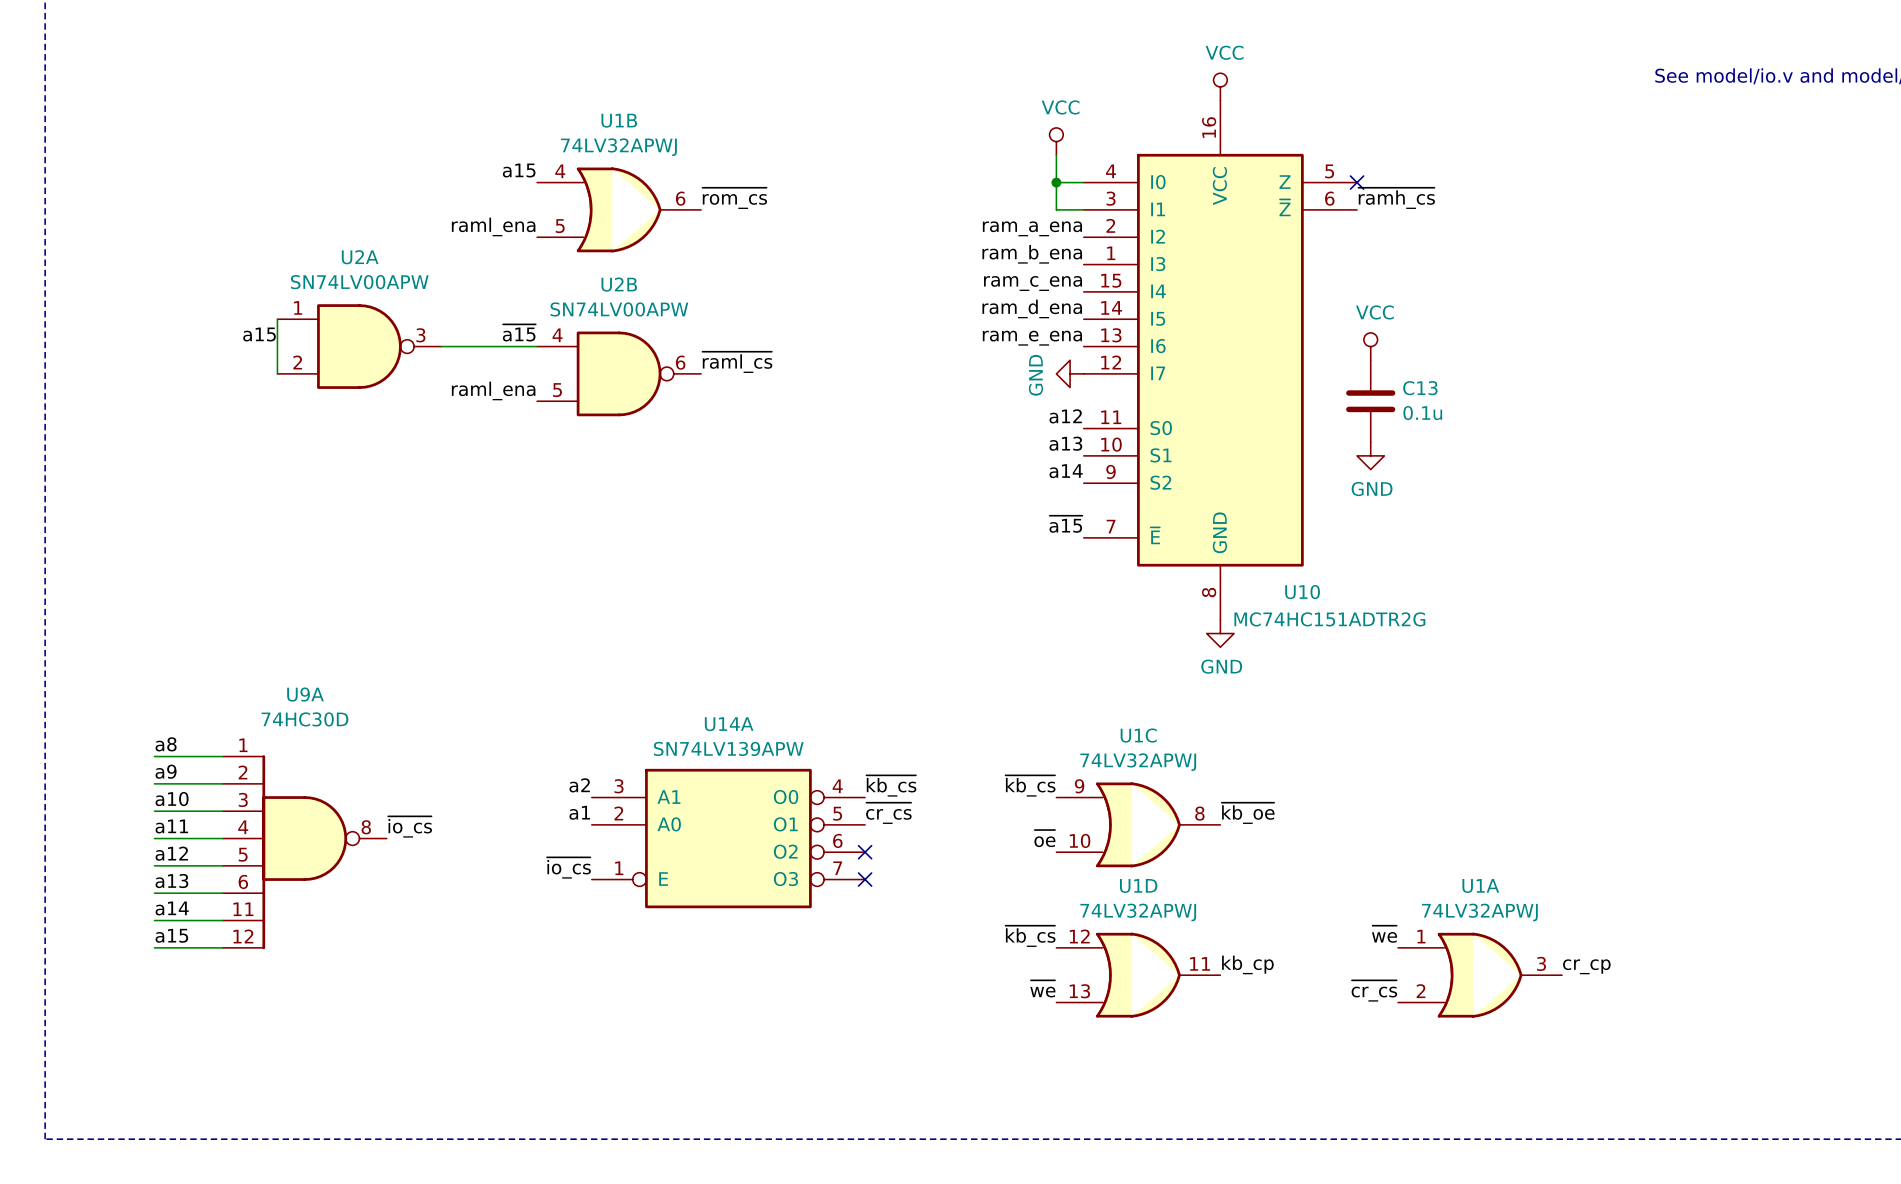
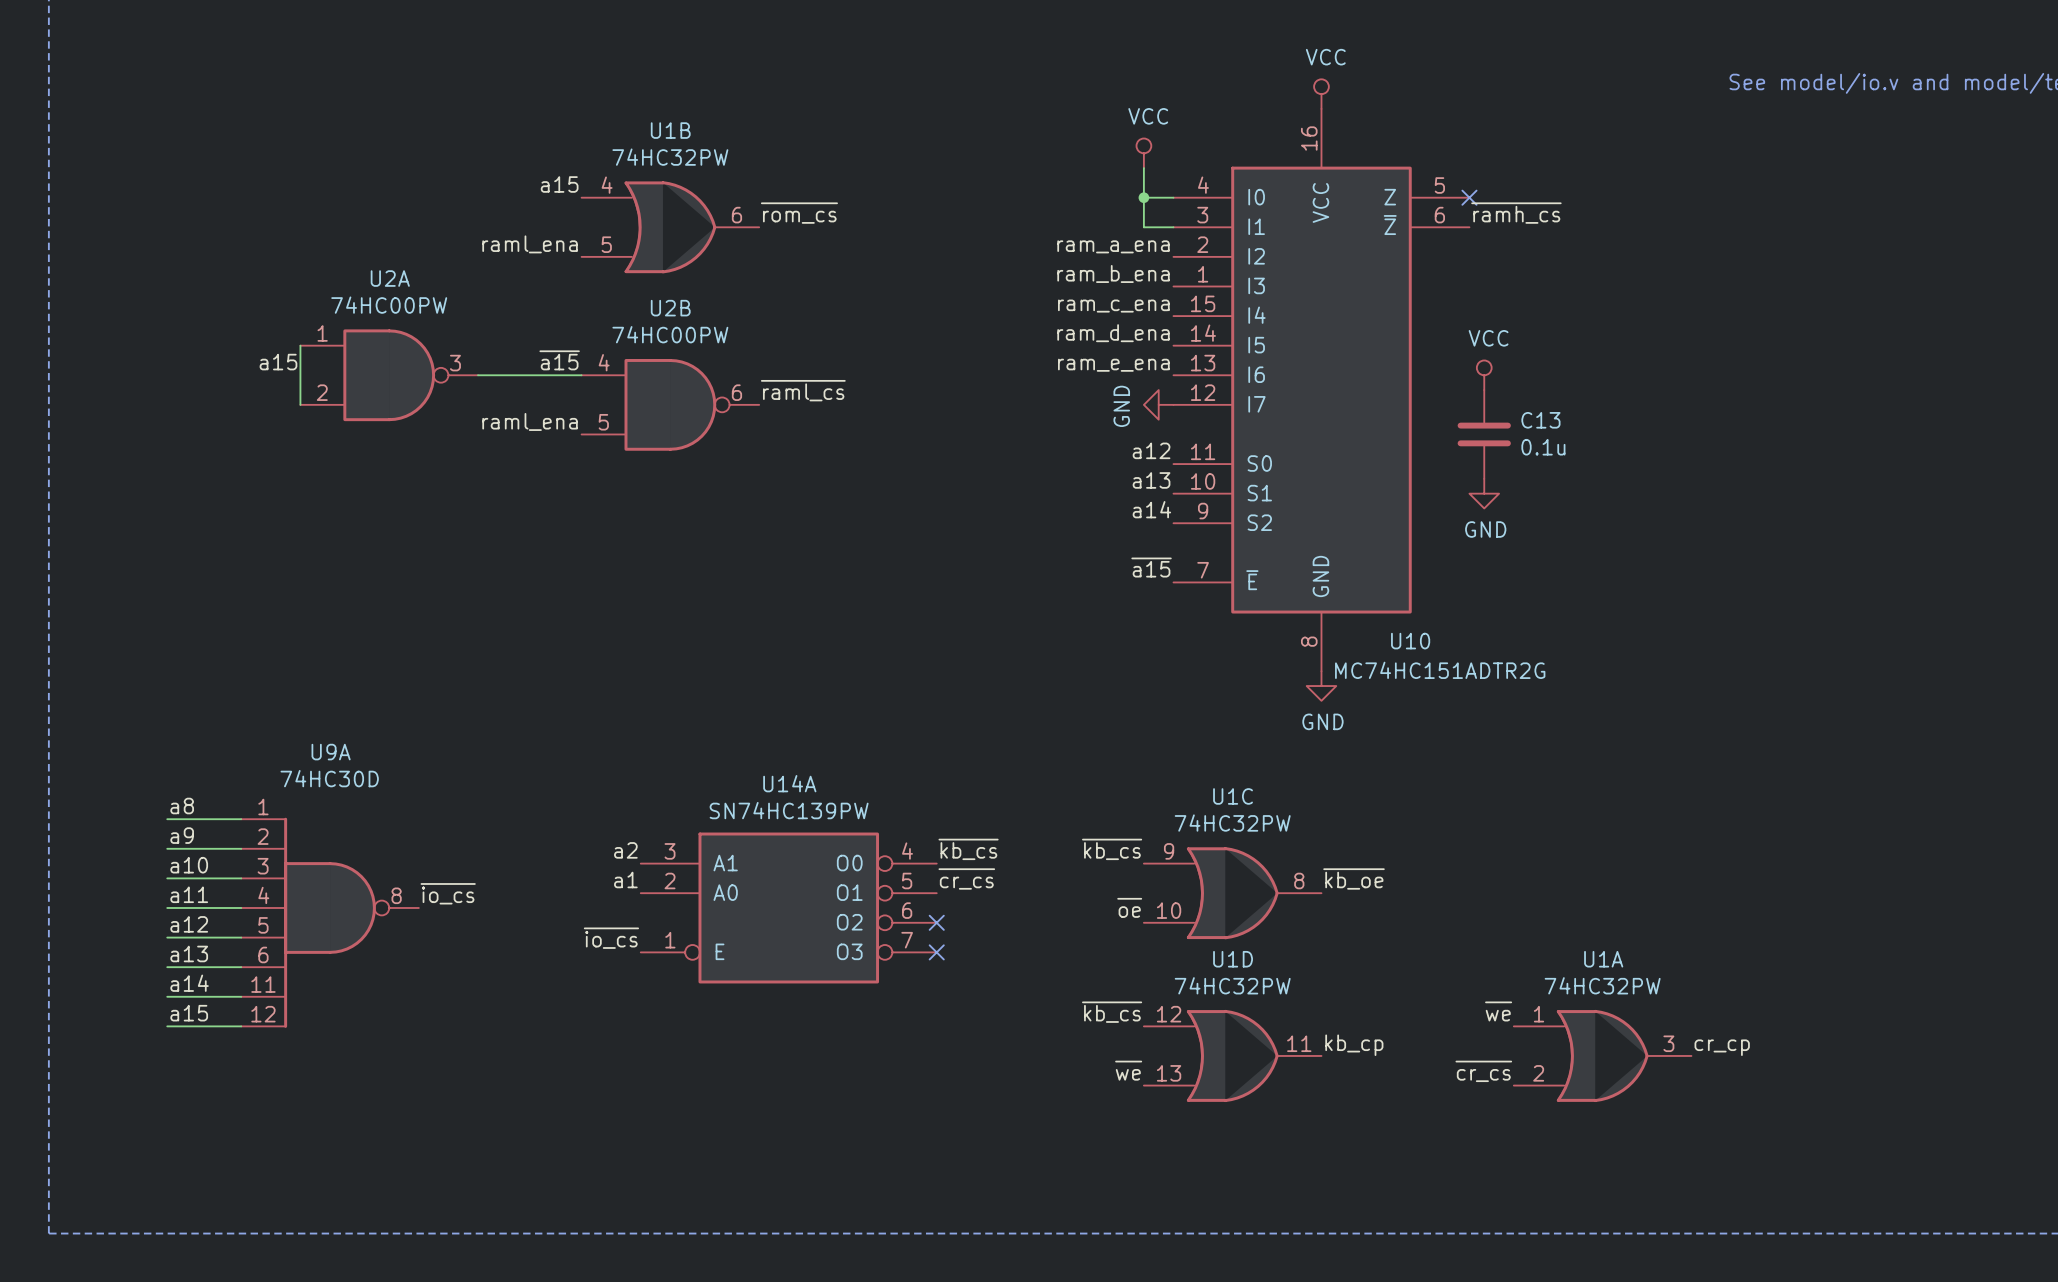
U1B value: 74LV32APWJ (618, 147) -> 74HC32PW (670, 157)
U2A value: SN74LV00APW (359, 282) -> 74HC00PW (389, 305)
U2B value: SN74LV00APW (619, 309) -> 74HC00PW (670, 334)
U14A value: SN74LV139APW (728, 748) -> SN74HC139PW (789, 810)
U1C value: 74LV32APWJ (1138, 762) -> 74HC32PW (1232, 823)
U1D value: 74LV32APWJ (1138, 912) -> 74HC32PW (1232, 985)
U1A value: 74LV32APWJ (1479, 912) -> 74HC32PW (1602, 985)

